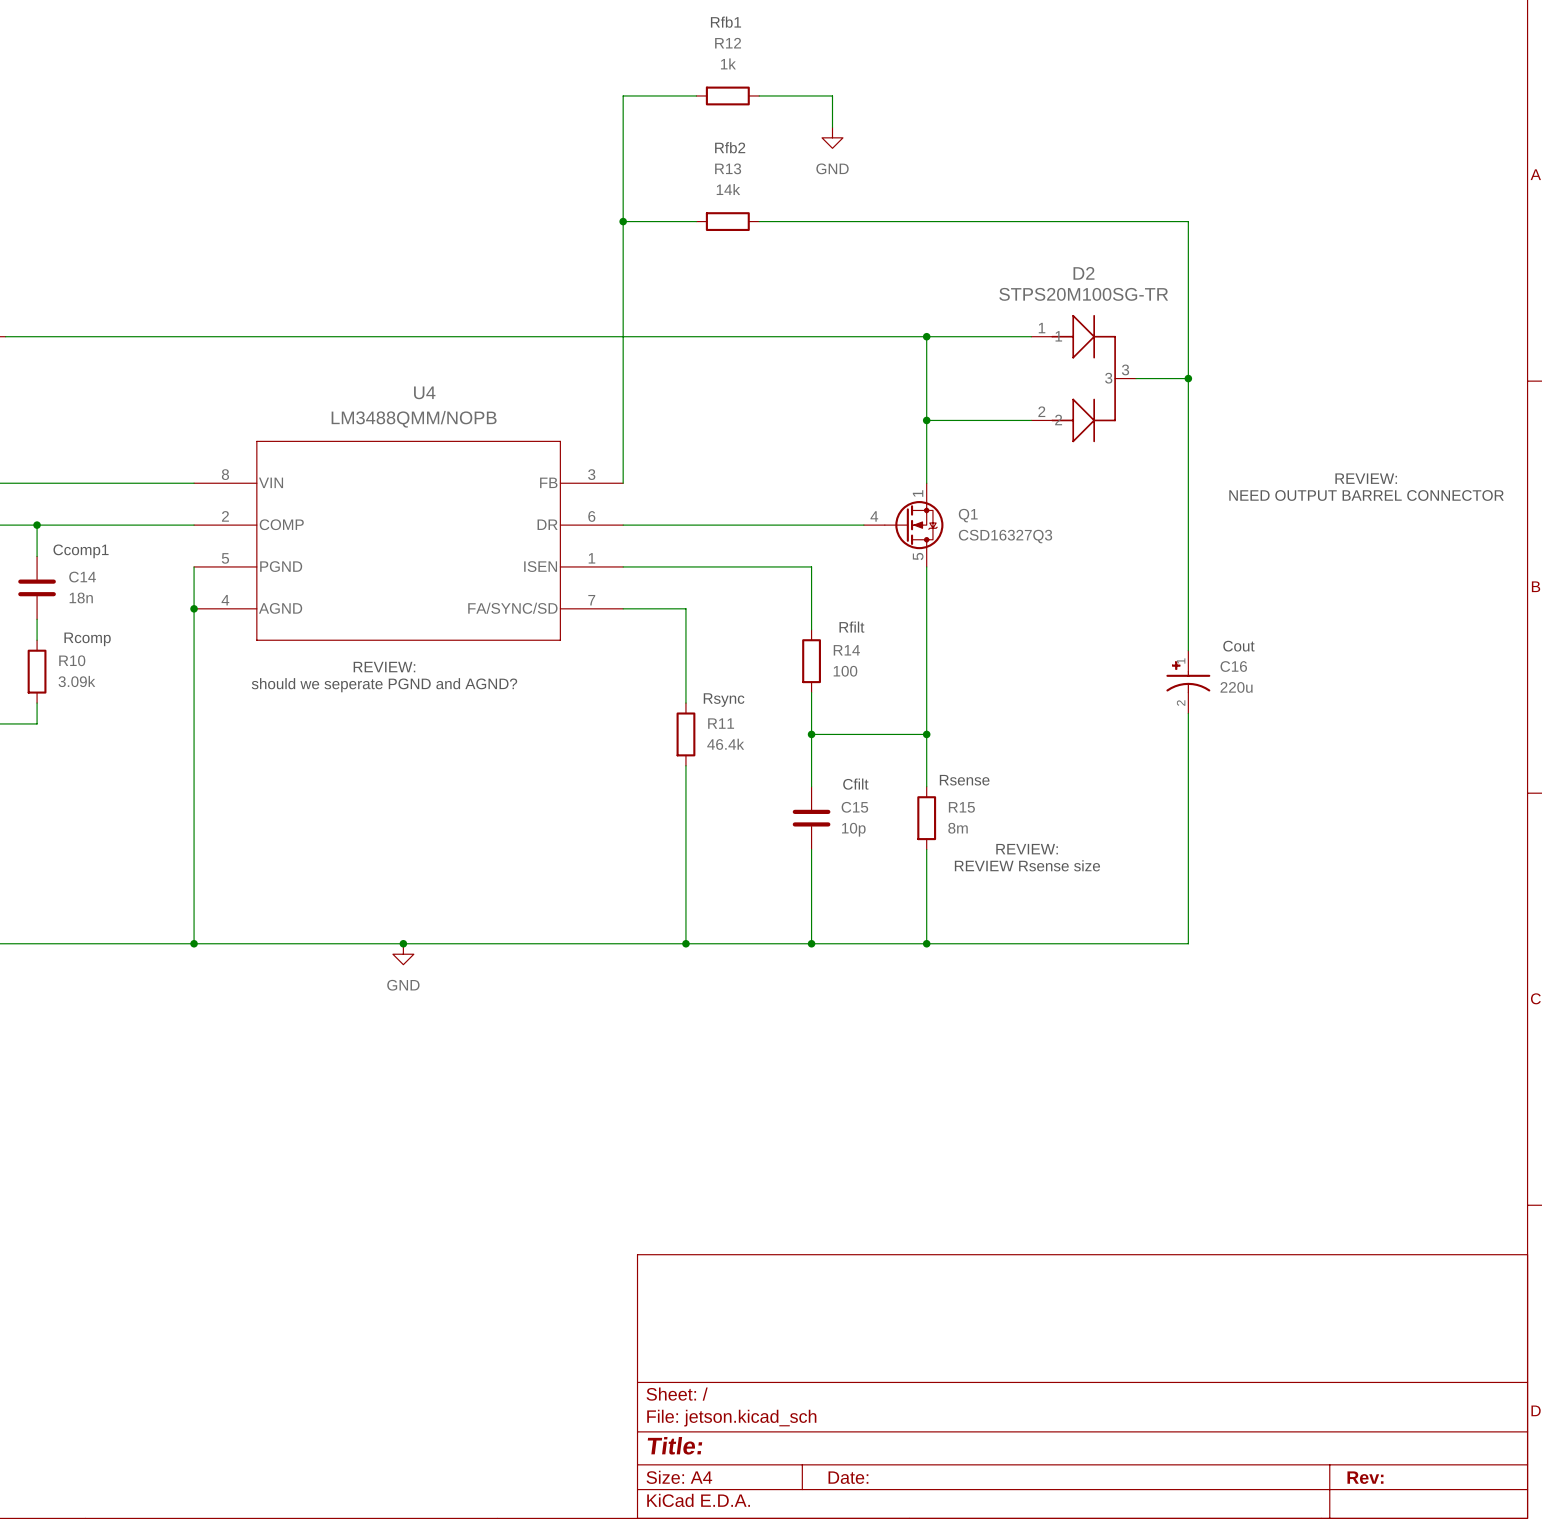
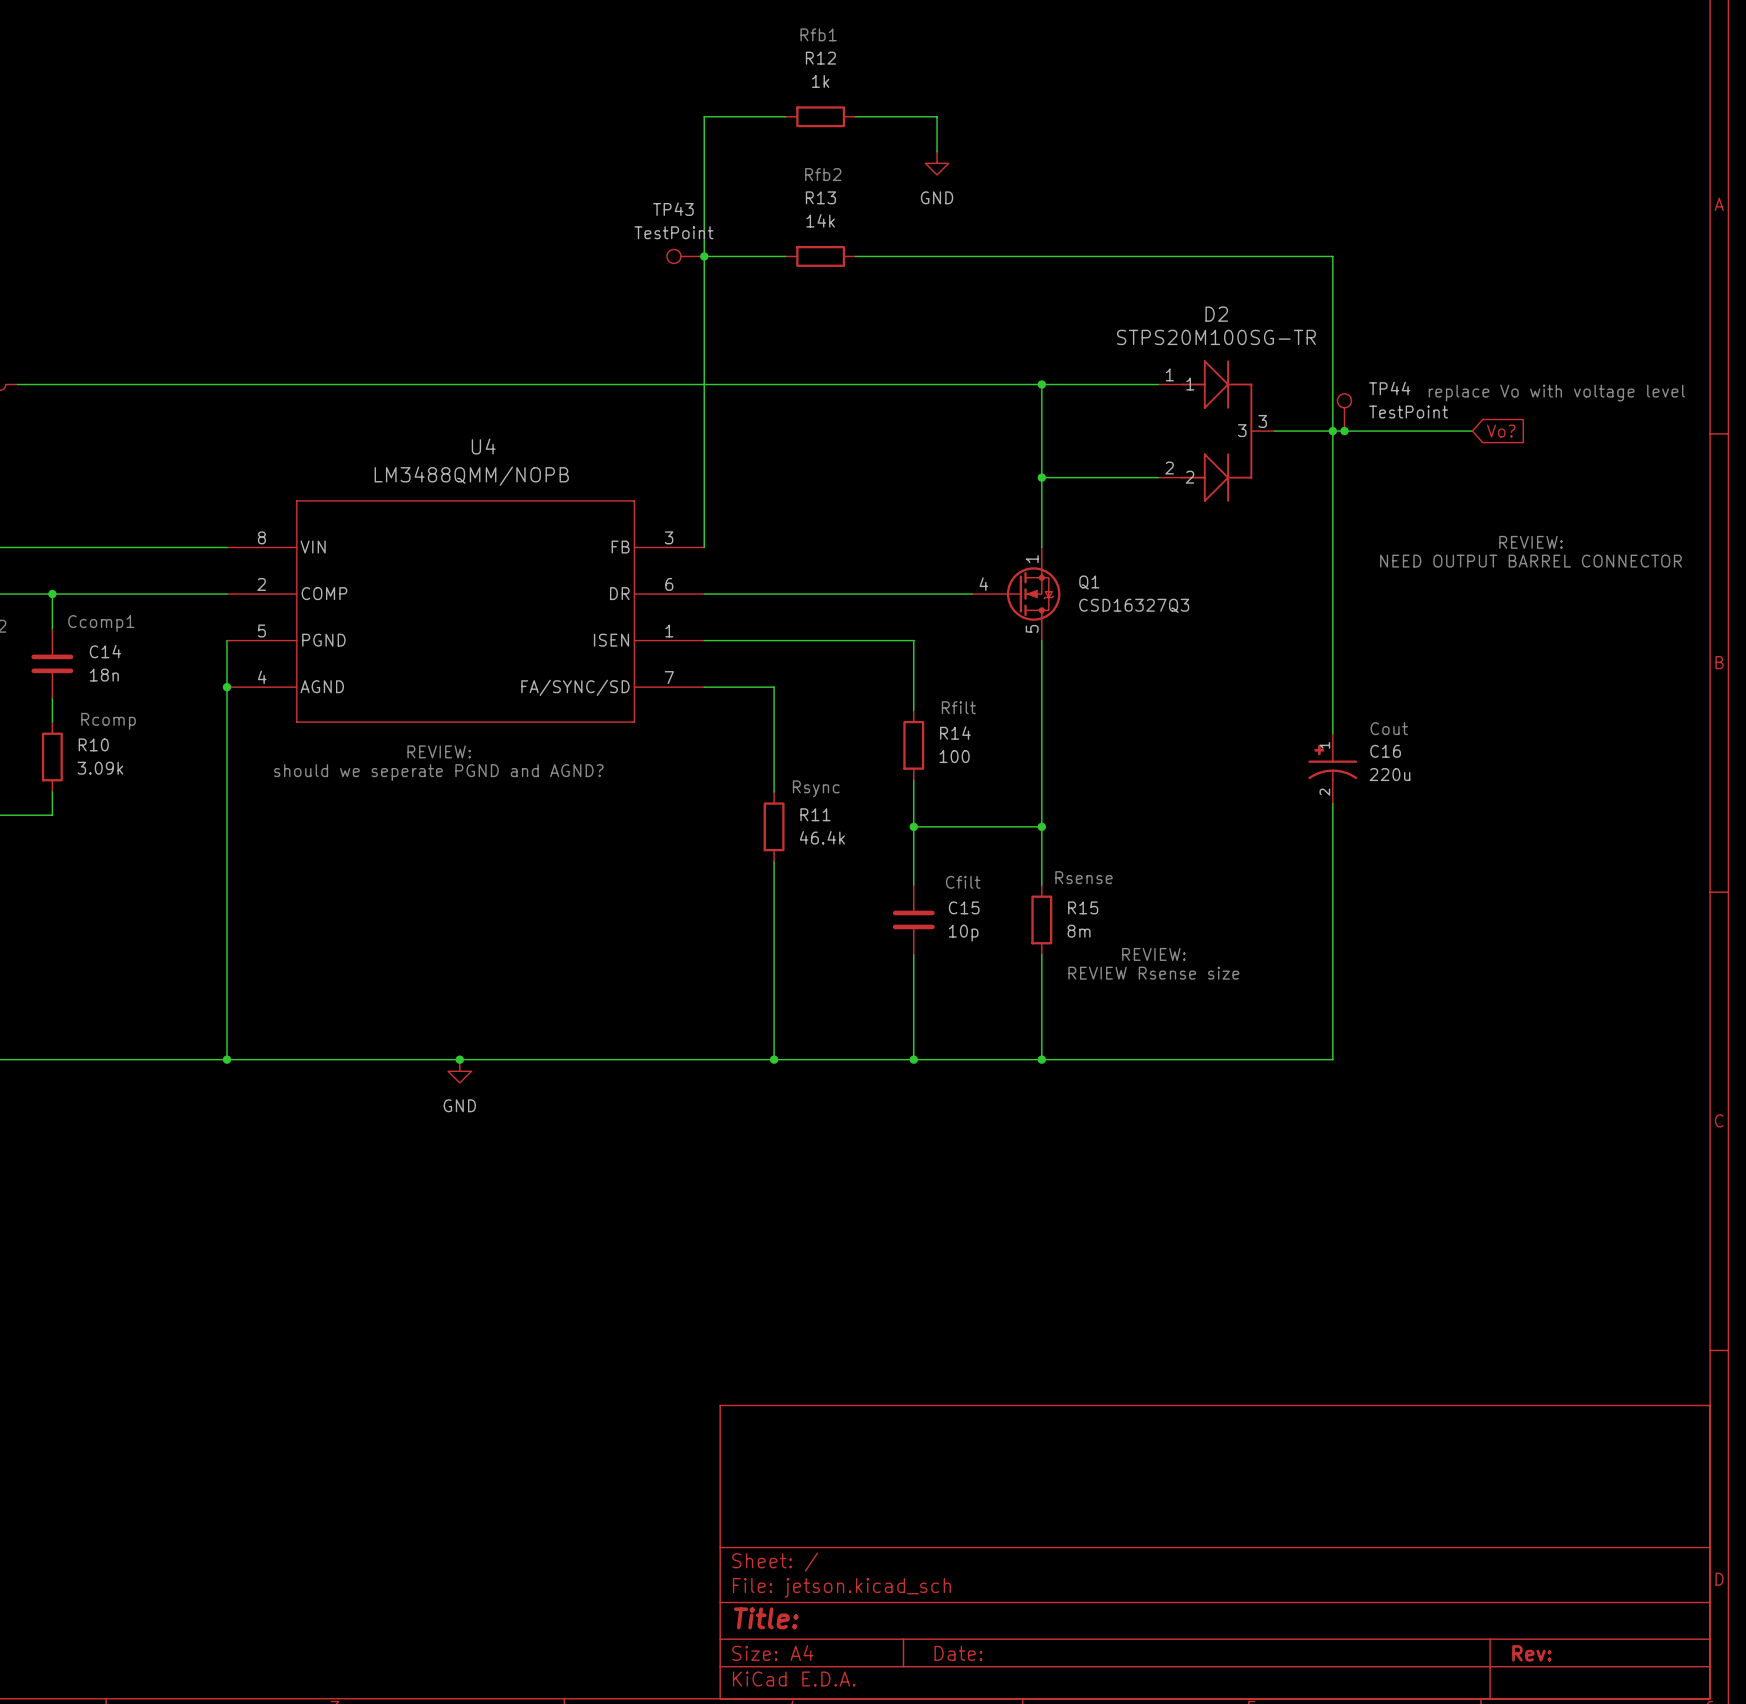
TP43: none -> TestPoint (685, 256)
text: none -> replace Vo with voltage level (1556, 393)
TP44: none -> TestPoint (1344, 412)
wire: none -> (1332, 431) (1472, 431)
junction: none -> (1344, 431)
global label: none -> Vo? (1501, 431)

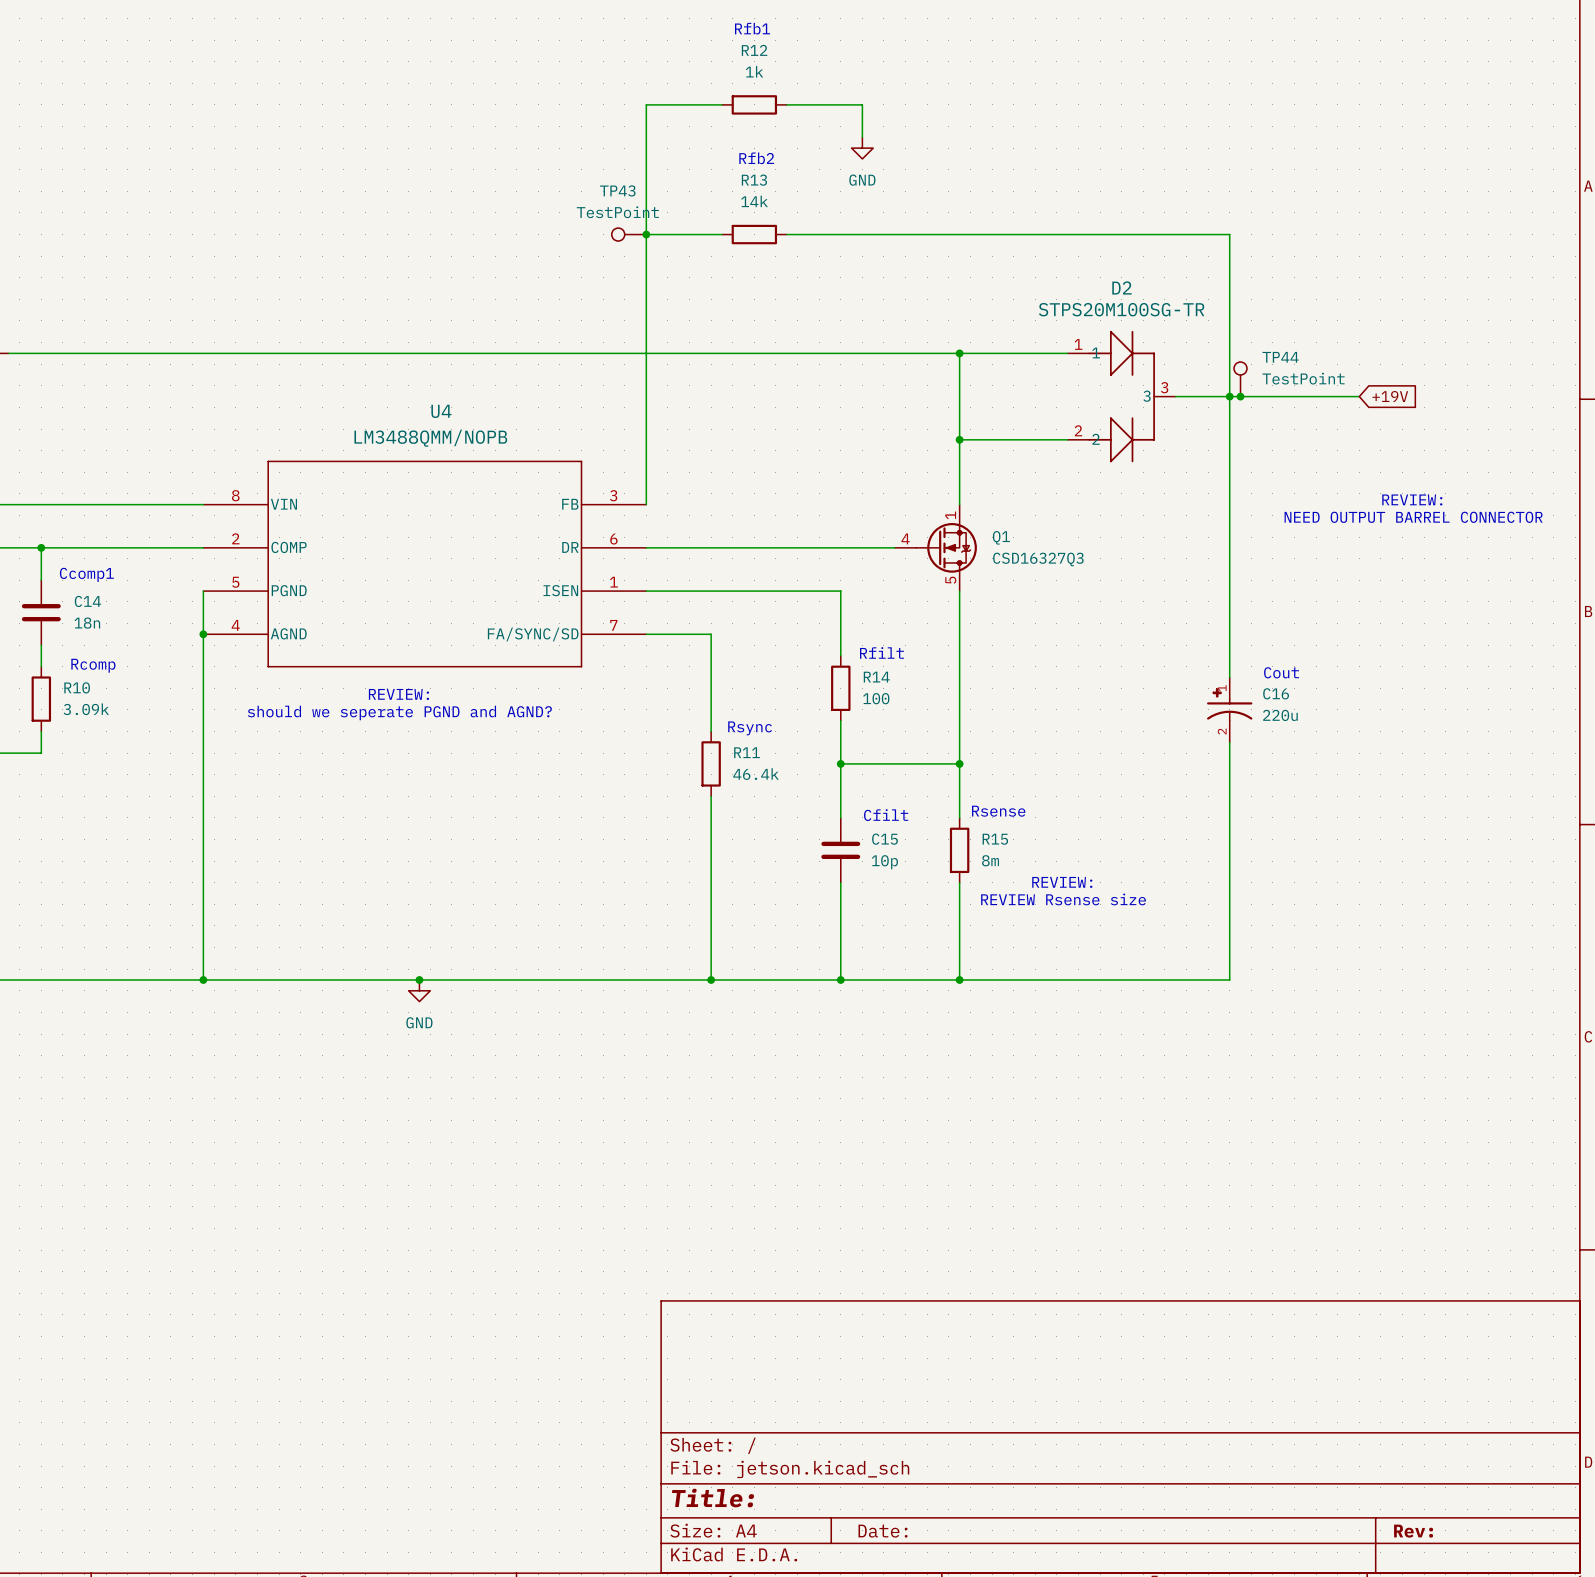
text: replace Vo with voltage level (1556, 393) -> none
global label: Vo? (1501, 431) -> +19V (1390, 396)

